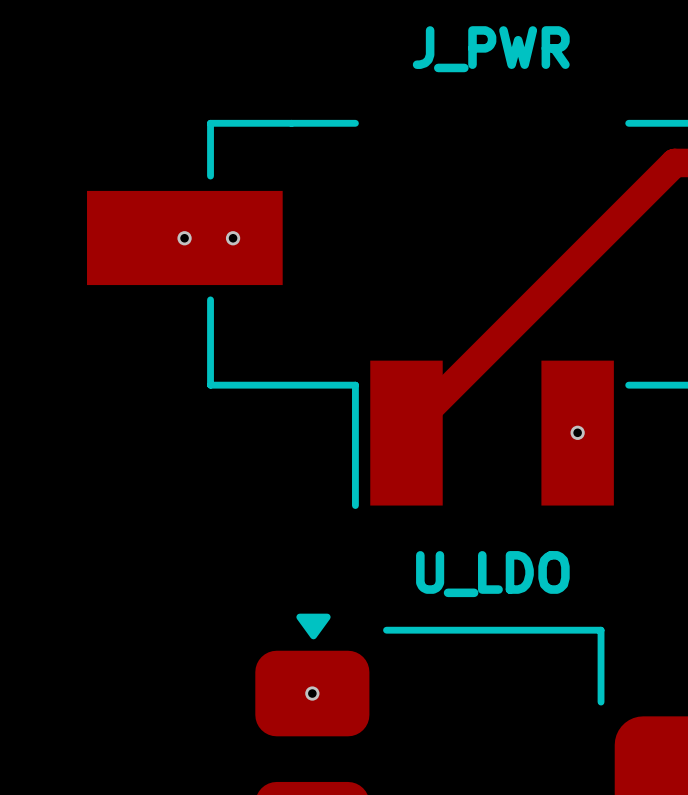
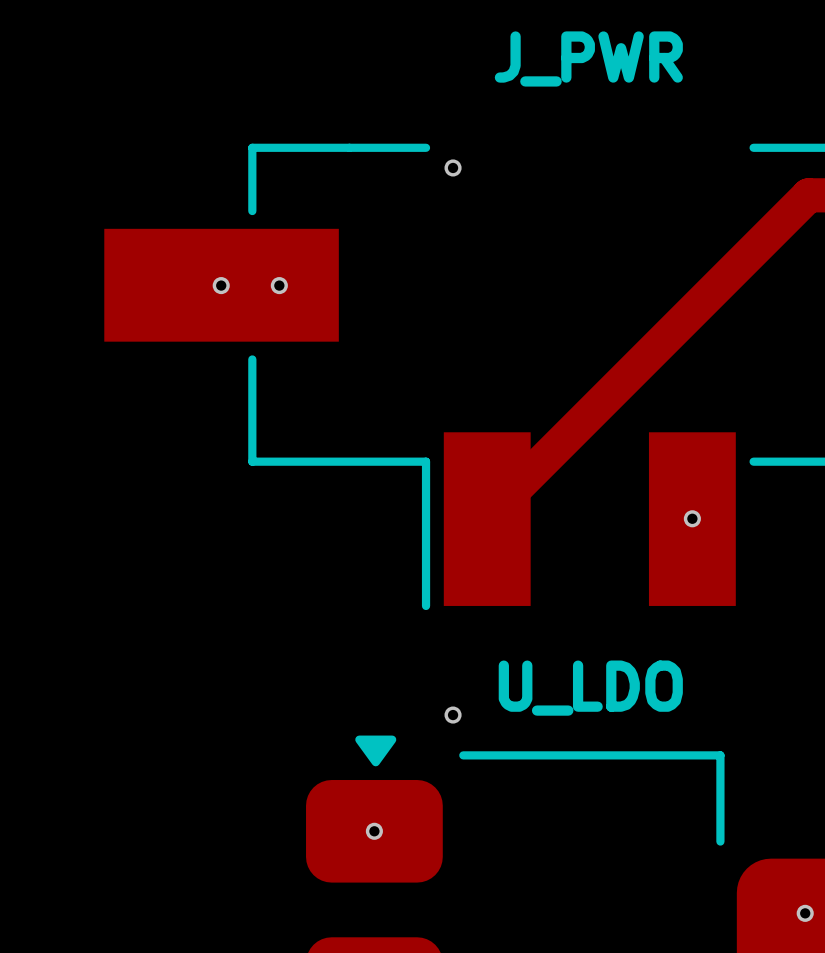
via: none -> (453, 167)
via: none -> (453, 715)
via: none -> (805, 913)

